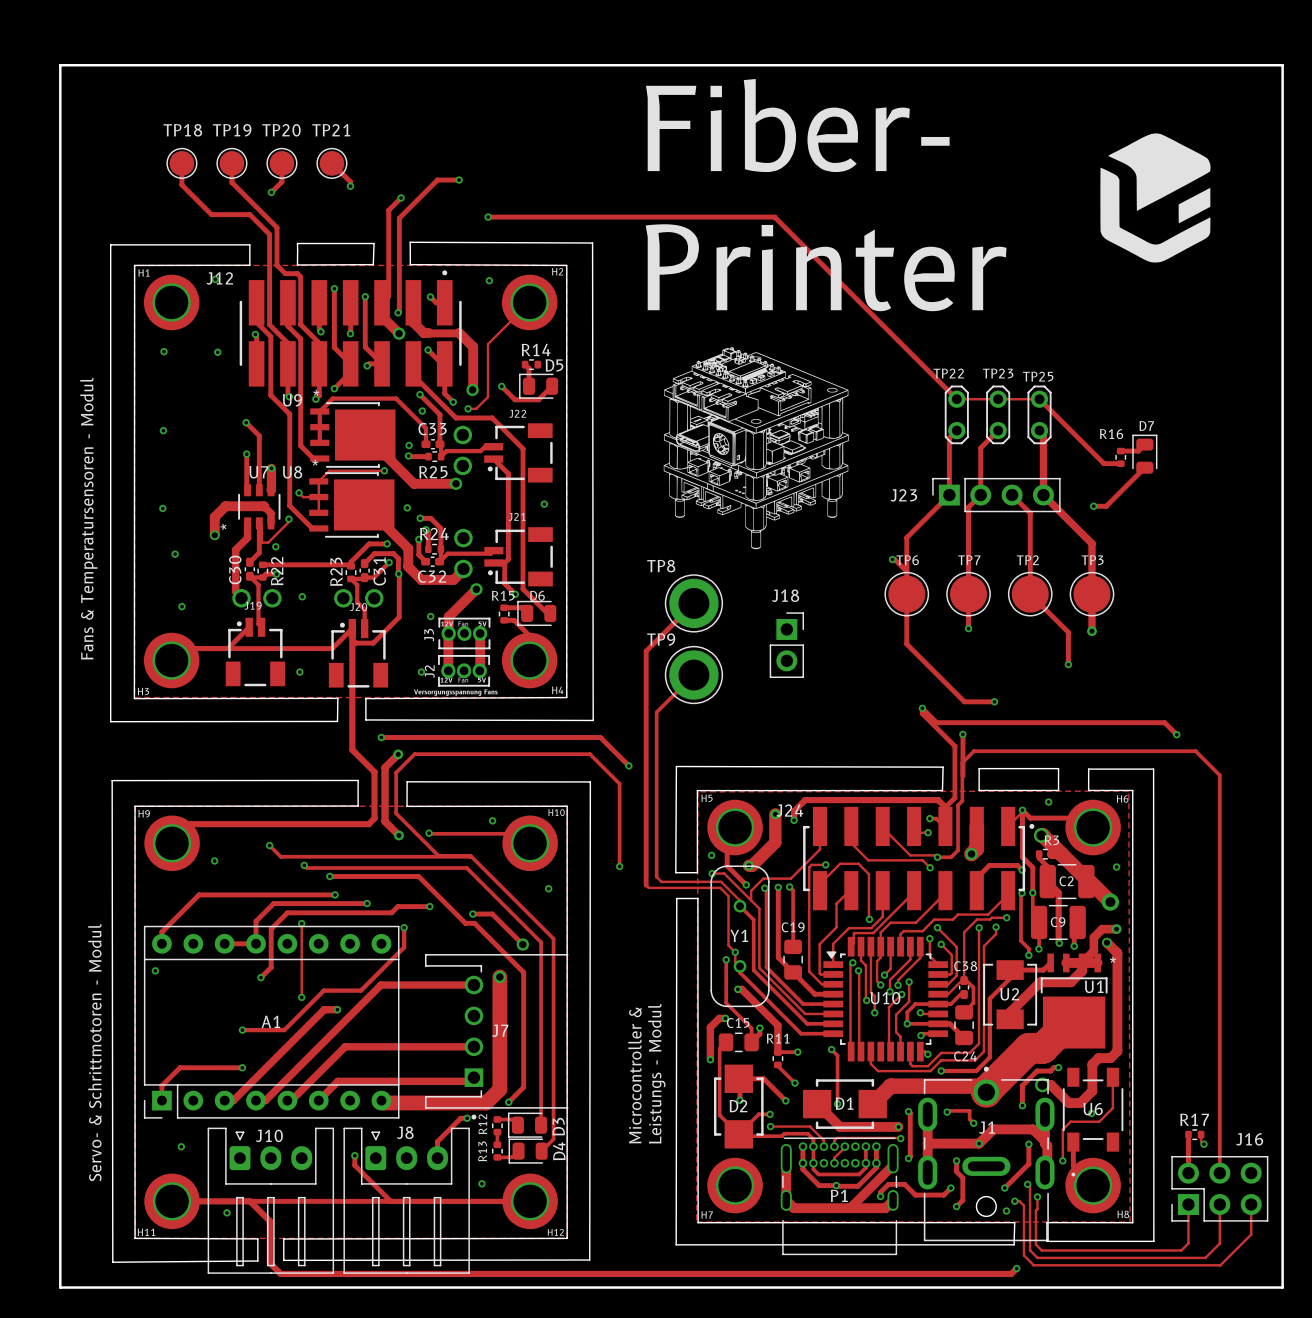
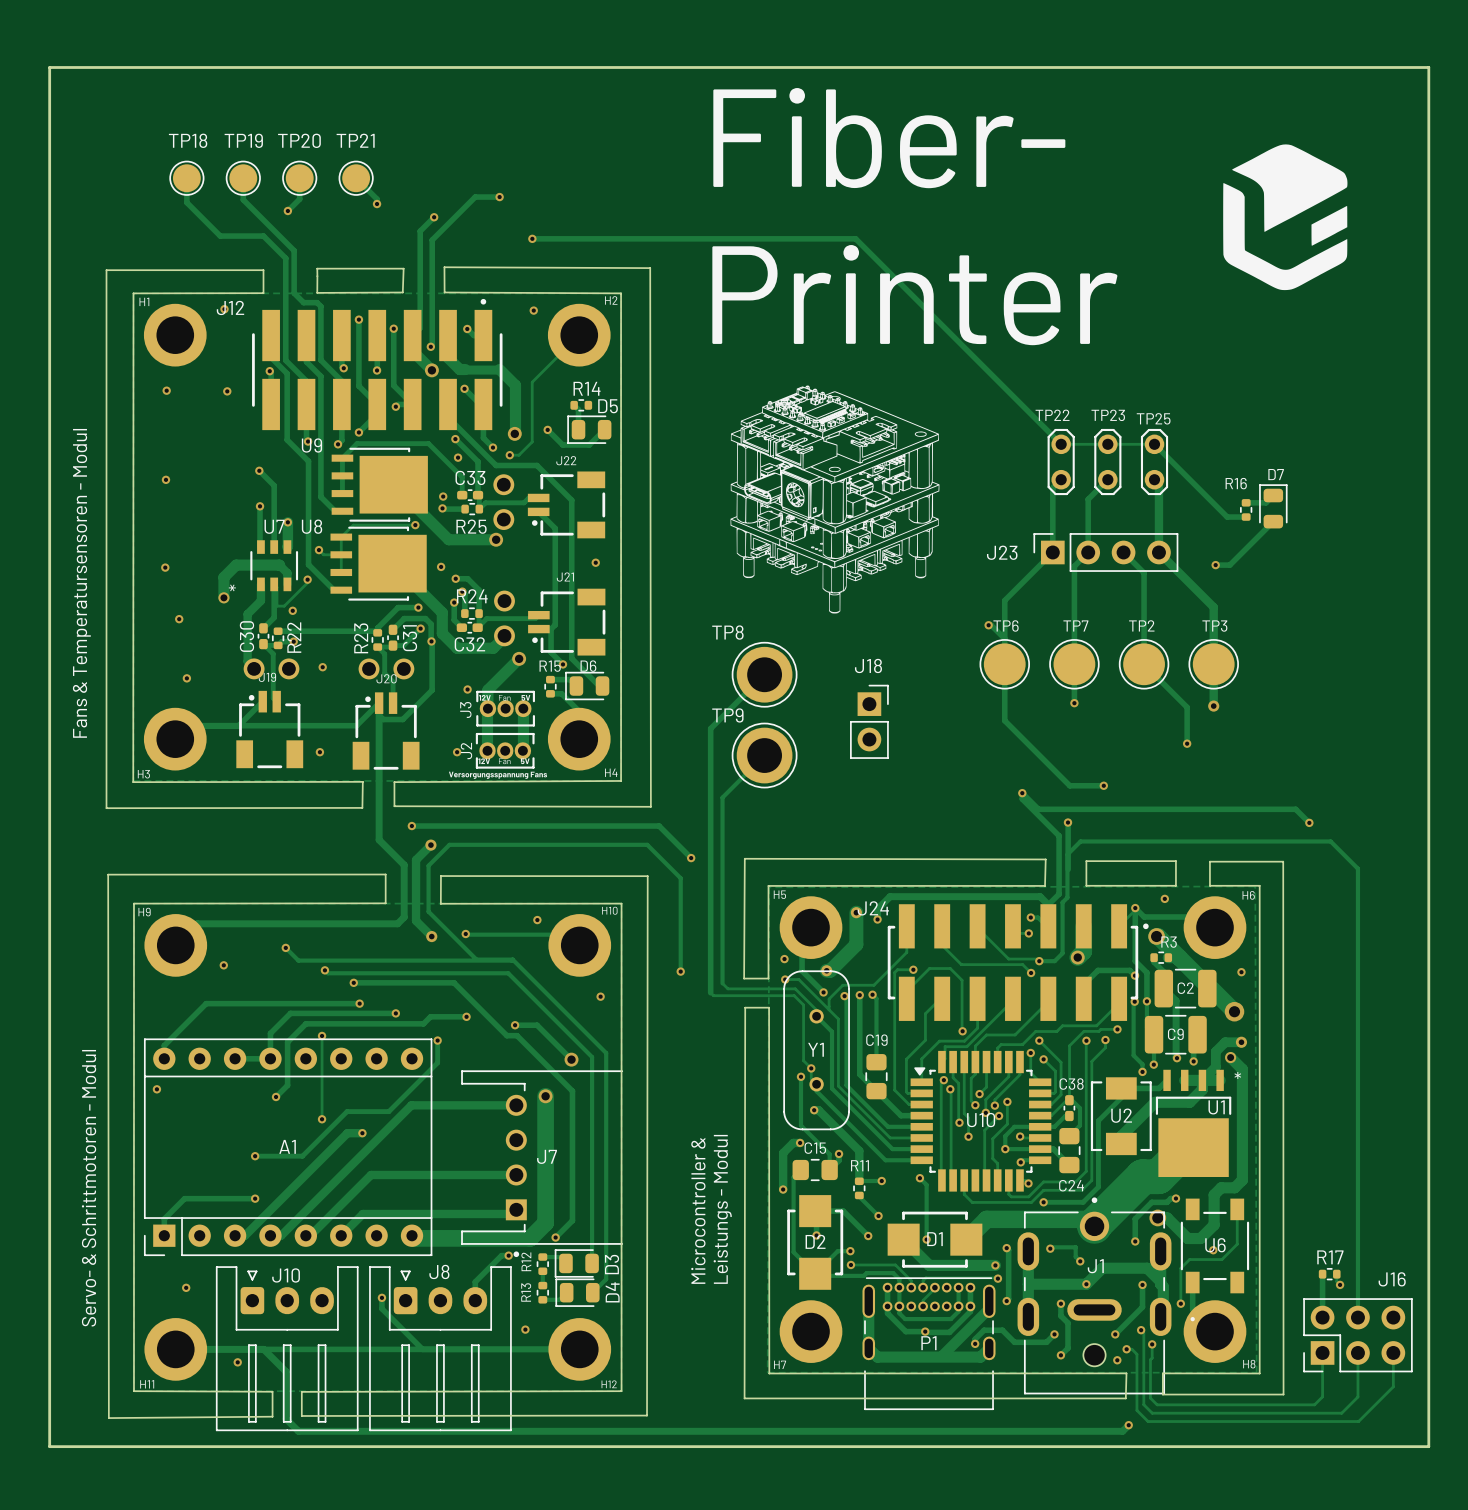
U9 text: * (316, 392) -> none
U8 text: * (315, 462) -> none

